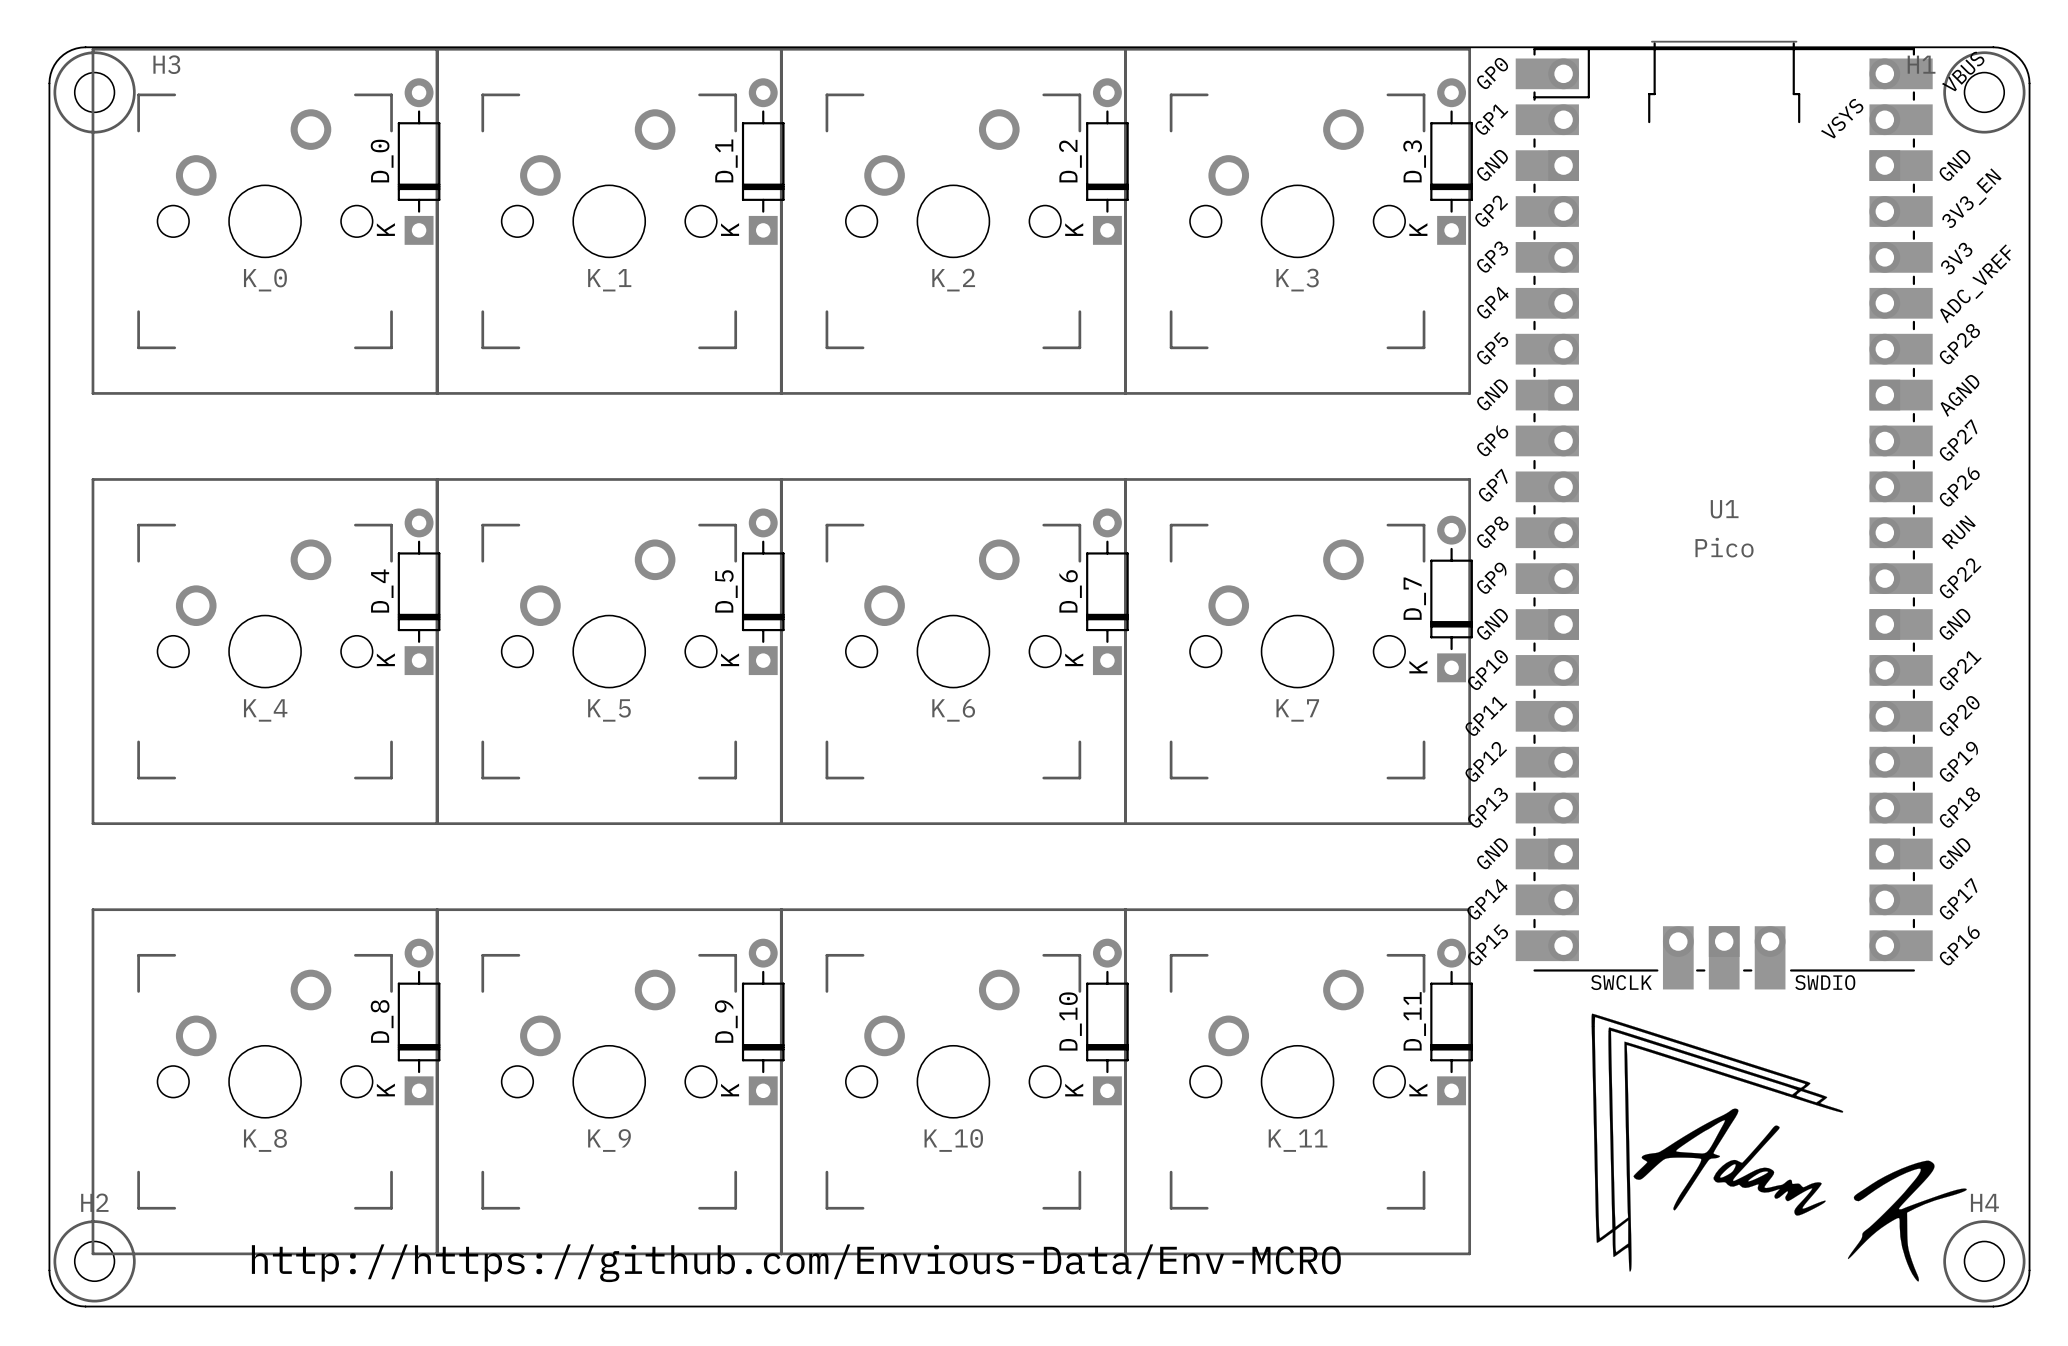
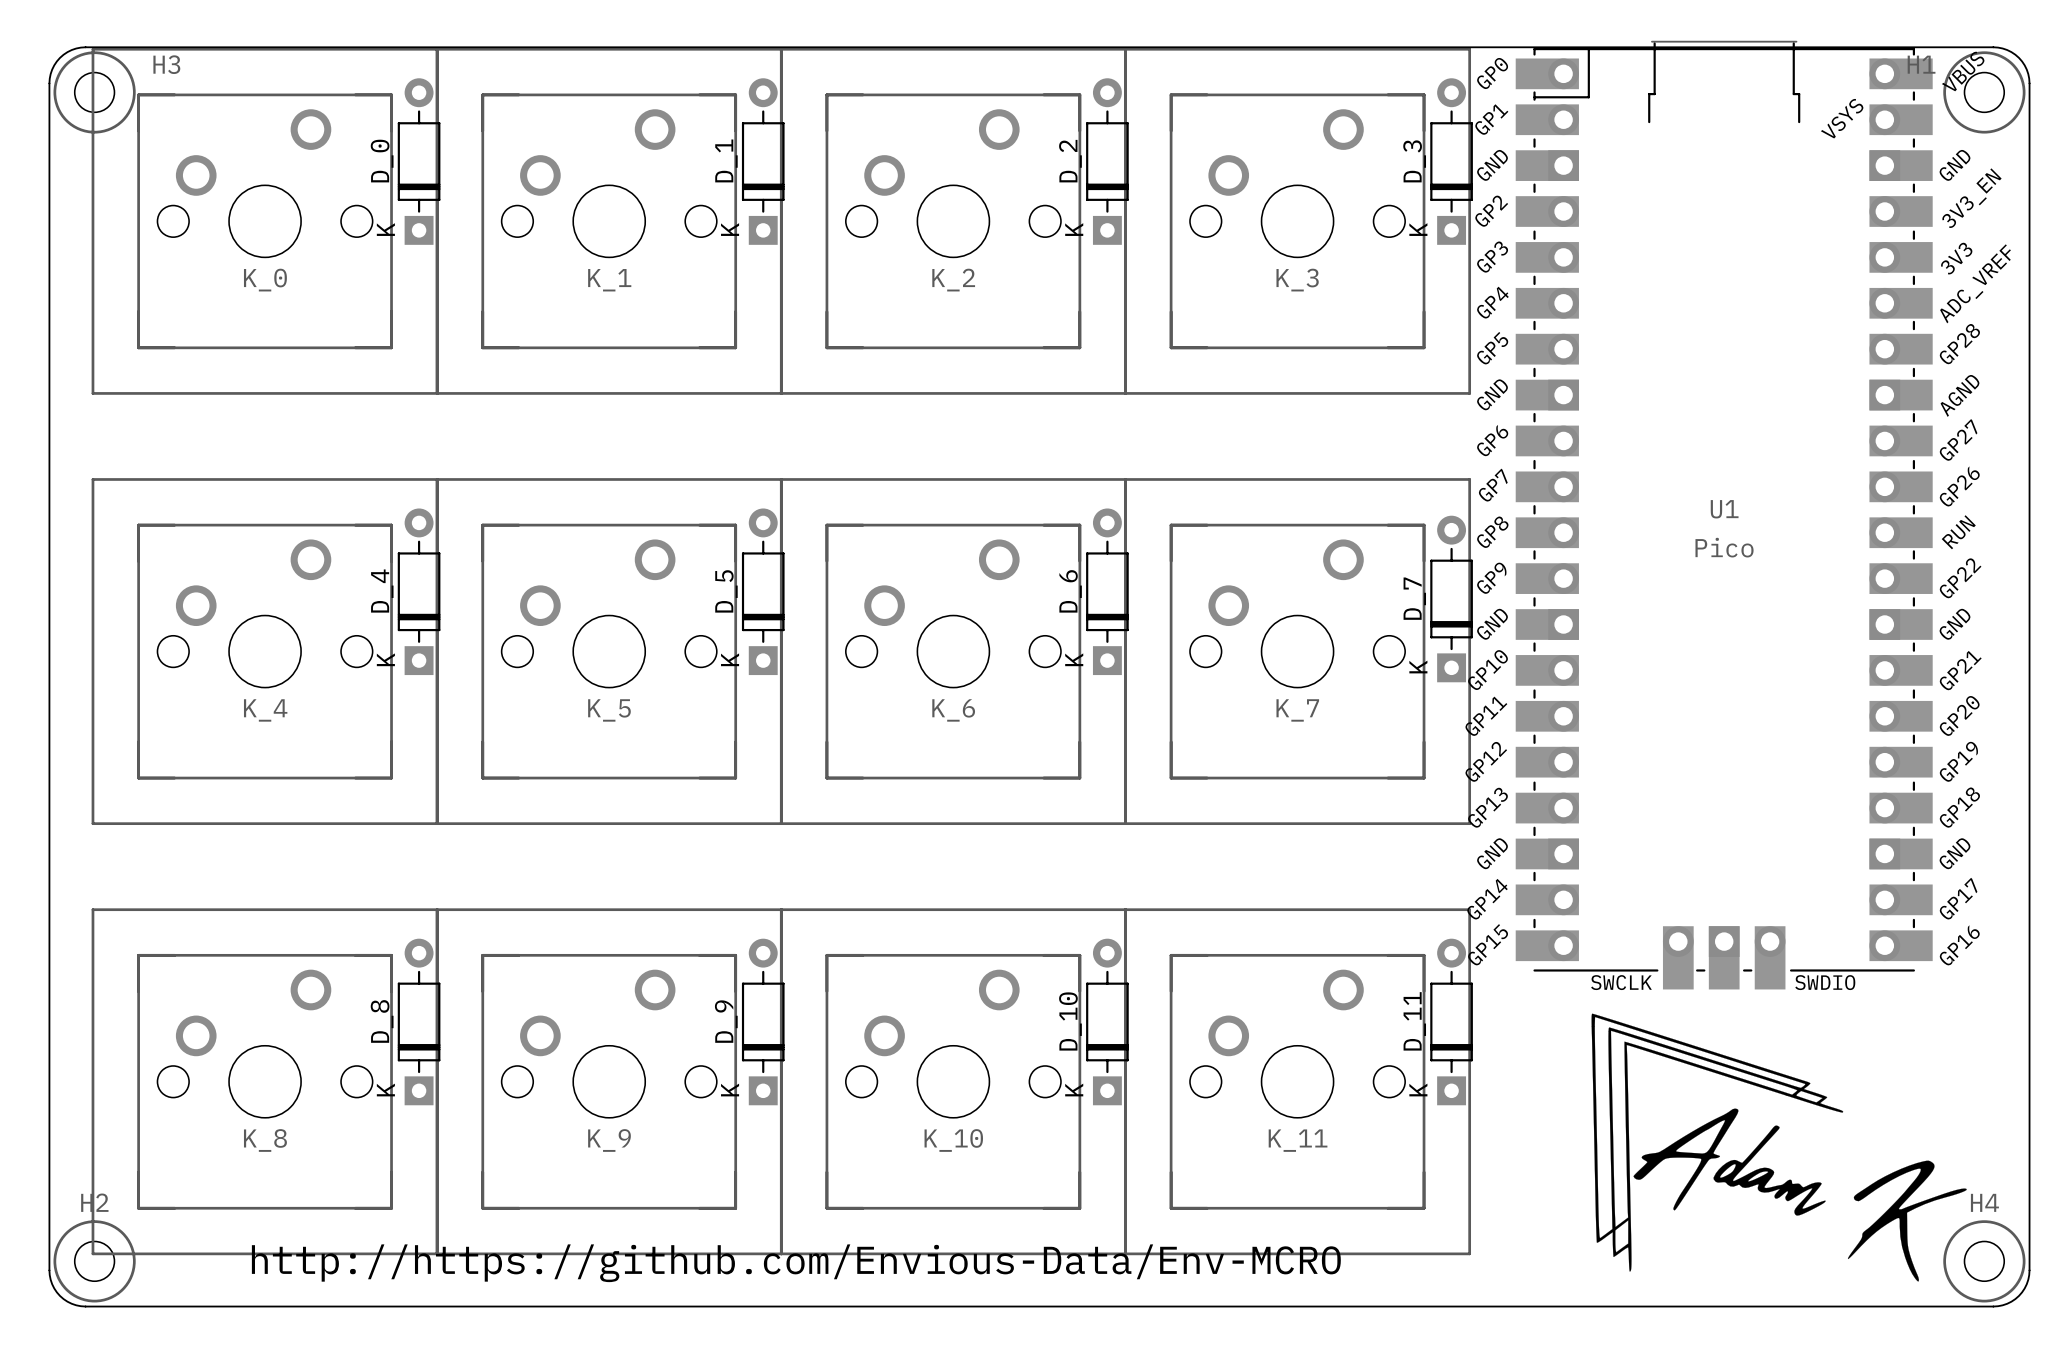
line: none -> (138, 94) (391, 94) (391, 347) (138, 347) (138, 94)
line: none -> (482, 94) (735, 94) (735, 347) (482, 347) (482, 94)
line: none -> (826, 94) (826, 347) (1079, 347) (1079, 94) (826, 94)
line: none -> (1171, 94) (1171, 347) (1424, 347) (1424, 94) (1171, 94)
line: none -> (138, 525) (391, 525) (391, 778) (138, 778) (138, 525)
line: none -> (482, 525) (735, 525) (735, 778) (482, 778) (482, 525)
line: none -> (826, 525) (1079, 525) (1079, 778) (826, 778) (826, 525)
line: none -> (1171, 525) (1171, 778) (1424, 778) (1424, 525) (1171, 525)
line: none -> (138, 955) (138, 1208) (391, 1208) (391, 955) (138, 955)
line: none -> (482, 955) (482, 1208) (735, 1208) (735, 955) (482, 955)
line: none -> (826, 955) (826, 1208) (1079, 1208) (1079, 955) (826, 955)
line: none -> (1171, 955) (1171, 1208) (1424, 1208) (1424, 955) (1171, 955)

